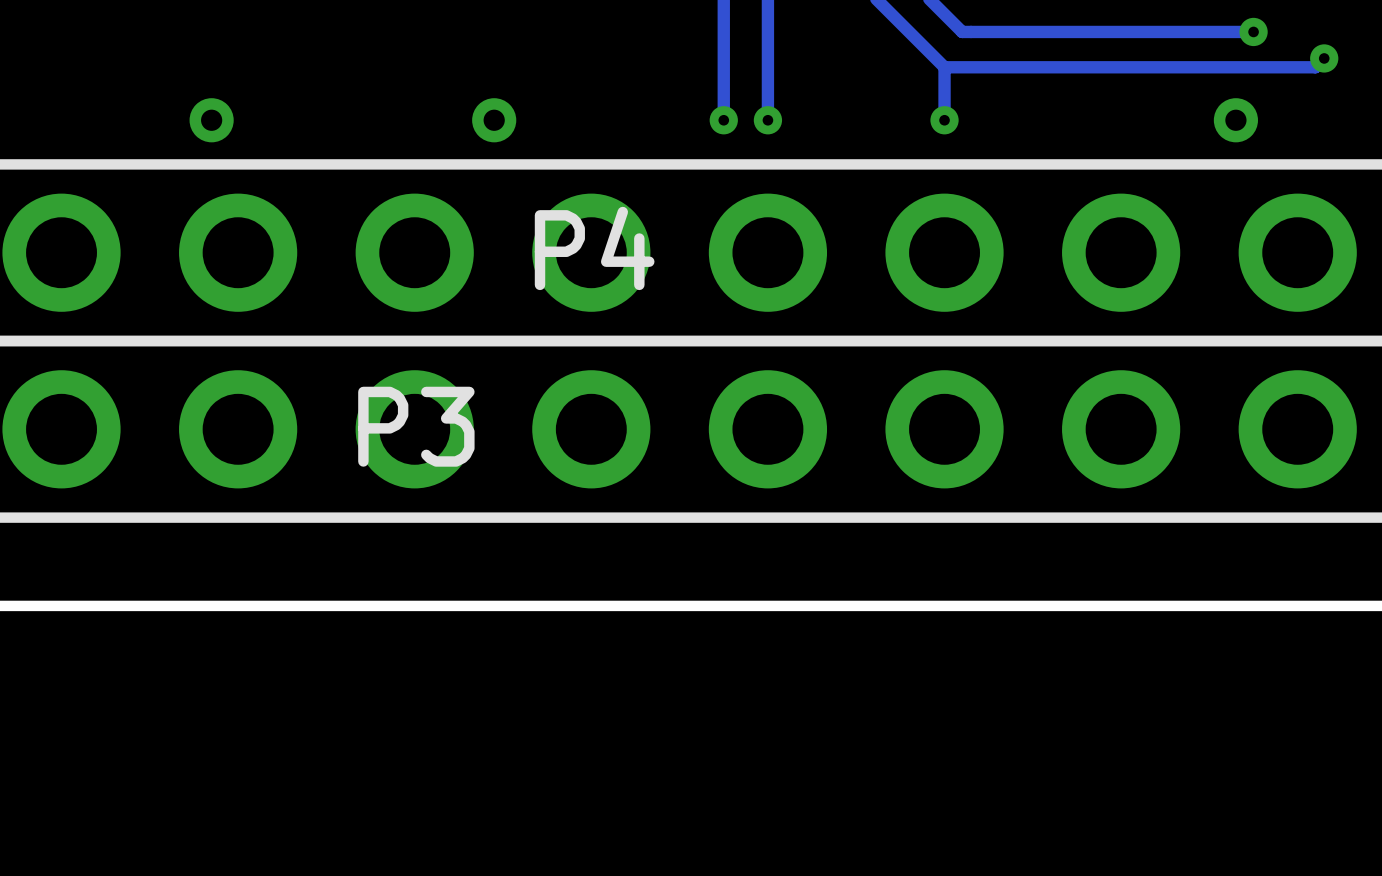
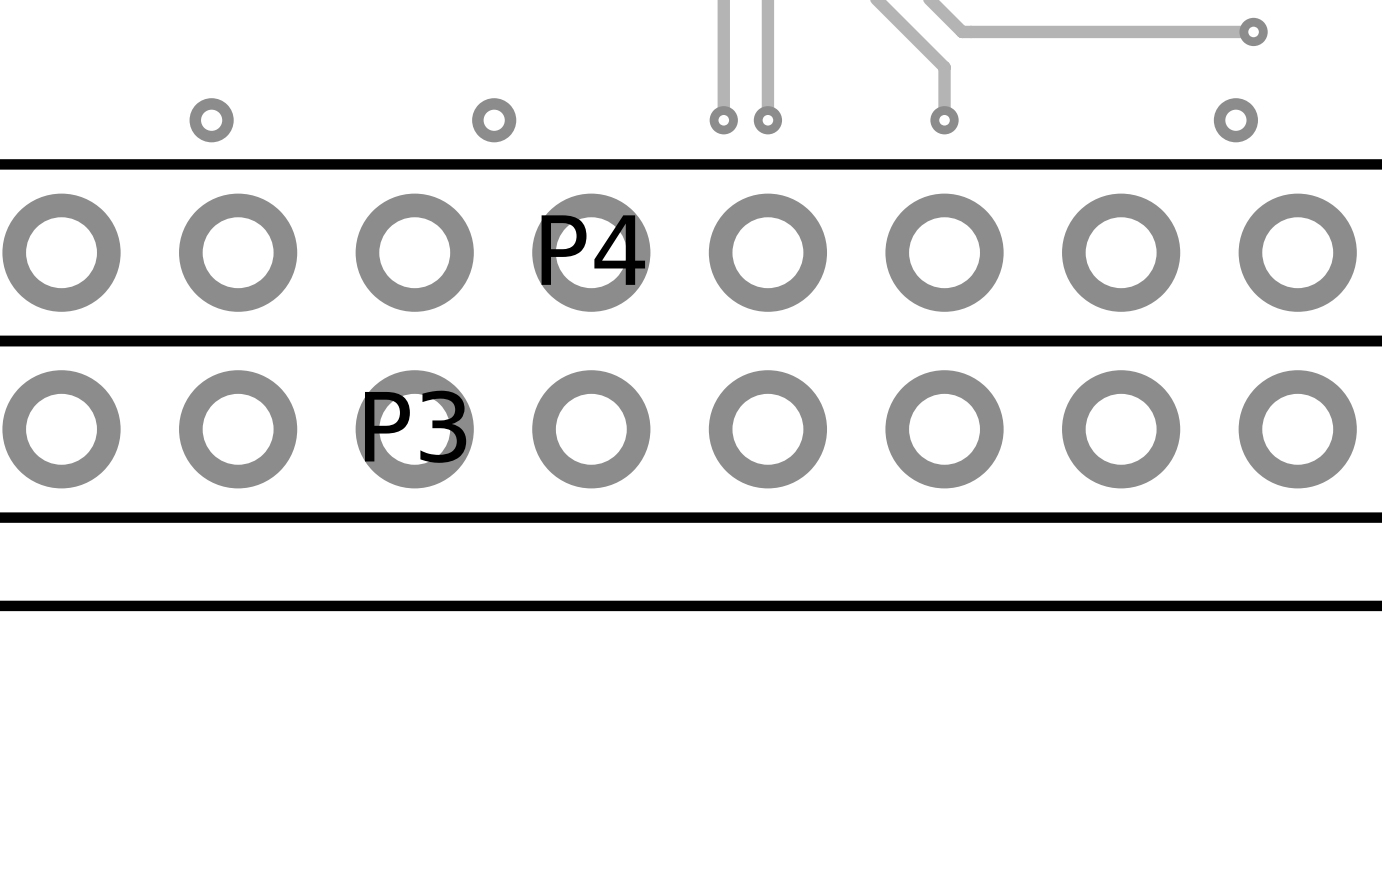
track: (1324, 58) (1315, 67) (944, 67) -> none
via: (1324, 58) -> none

